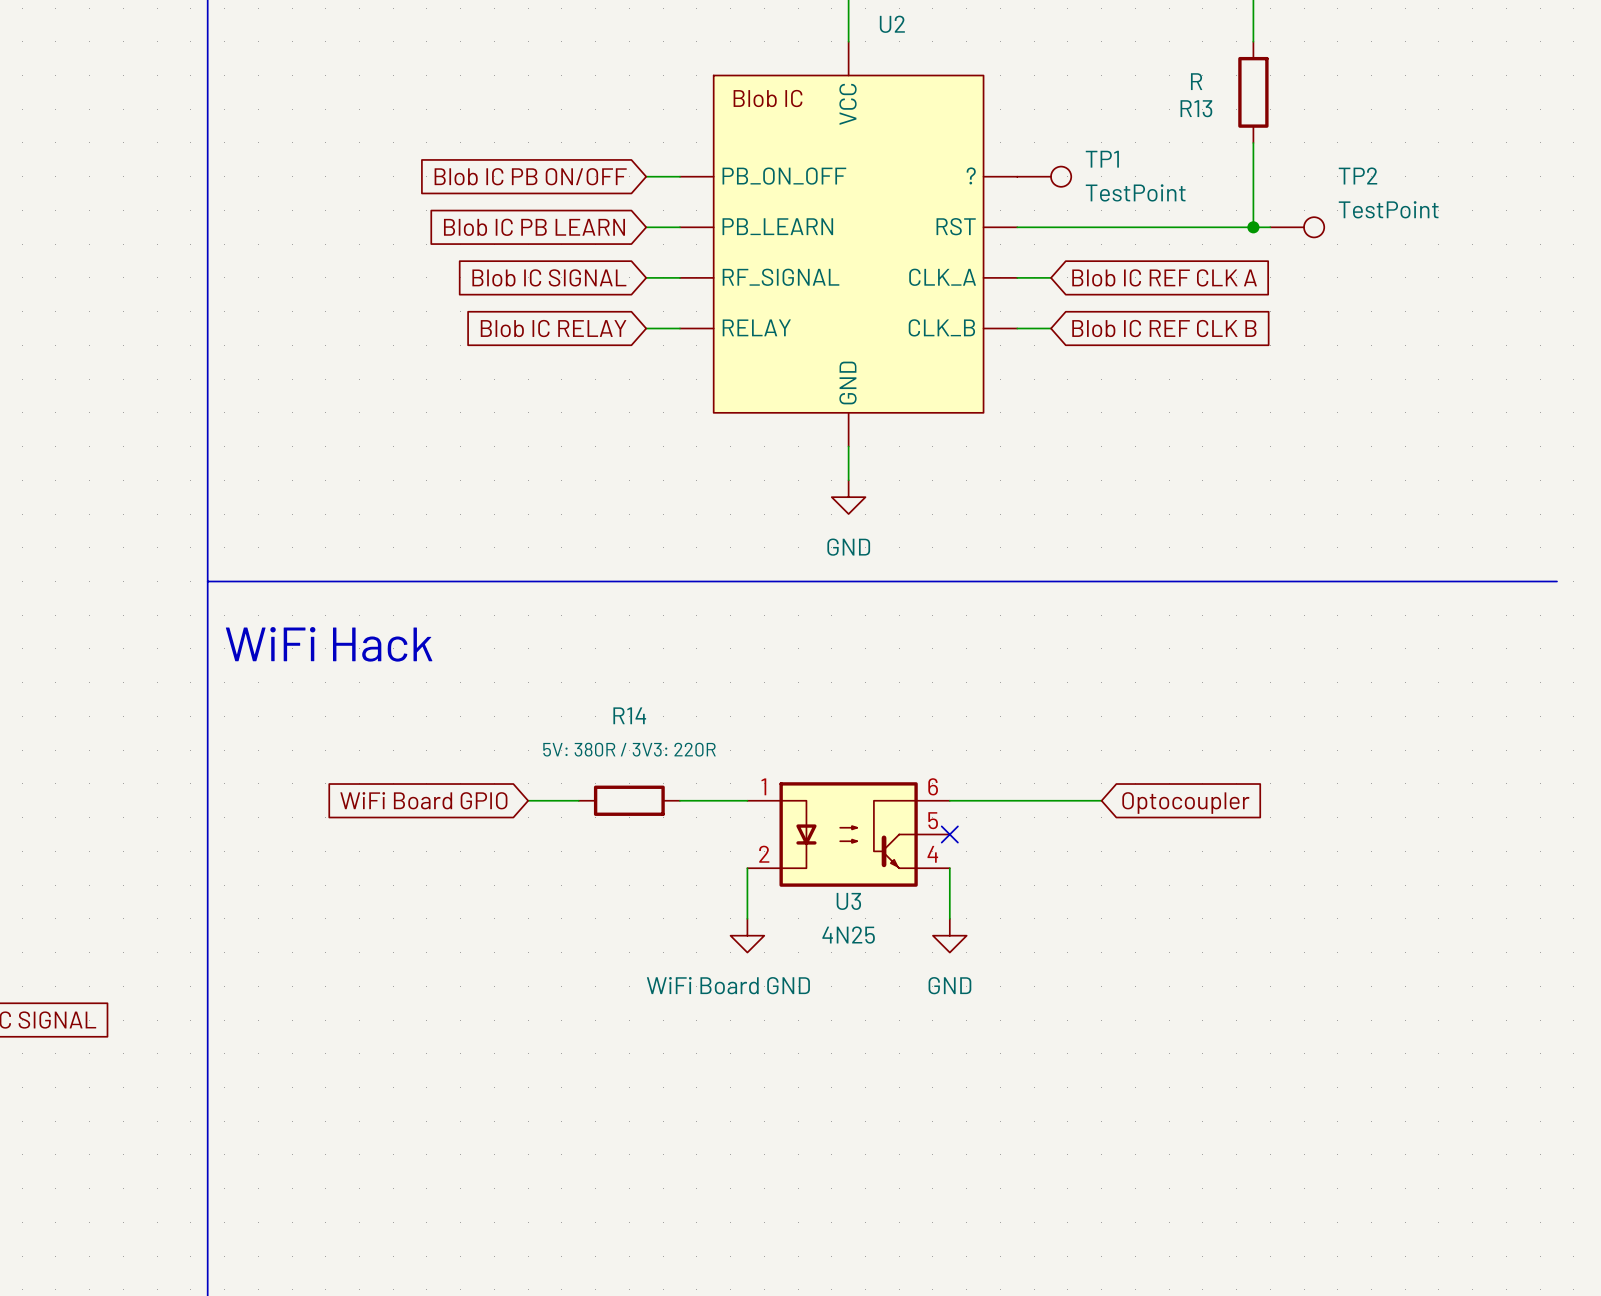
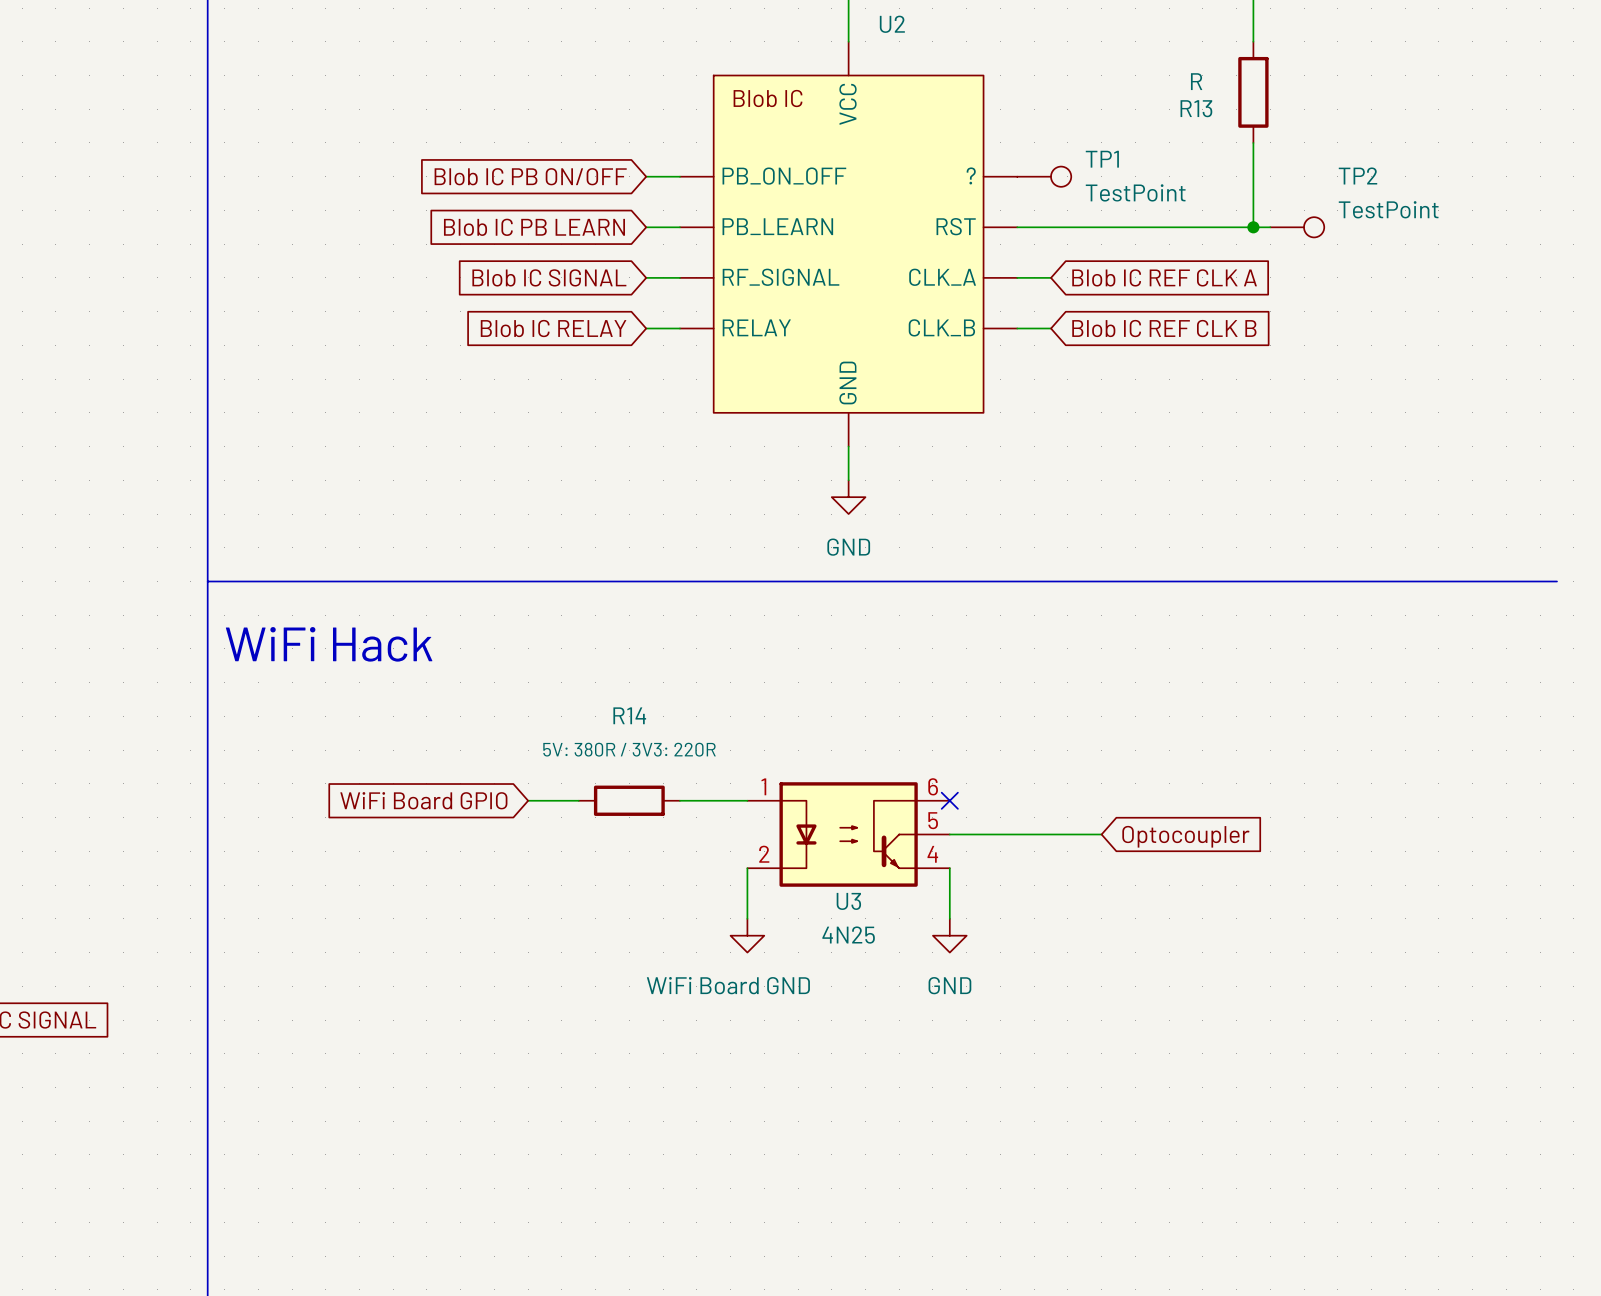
wire: (949, 800) (1101, 800) -> (949, 834) (1101, 834)
global label position: Optocoupler (1185, 803) -> Optocoupler (1185, 836)
no-connect mark position: (949, 834) -> (949, 800)

